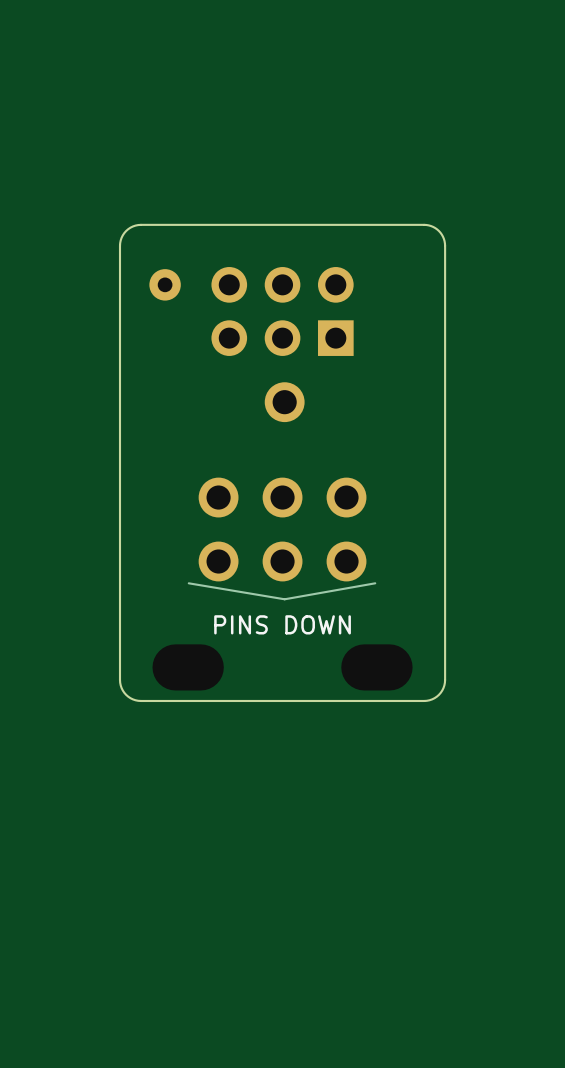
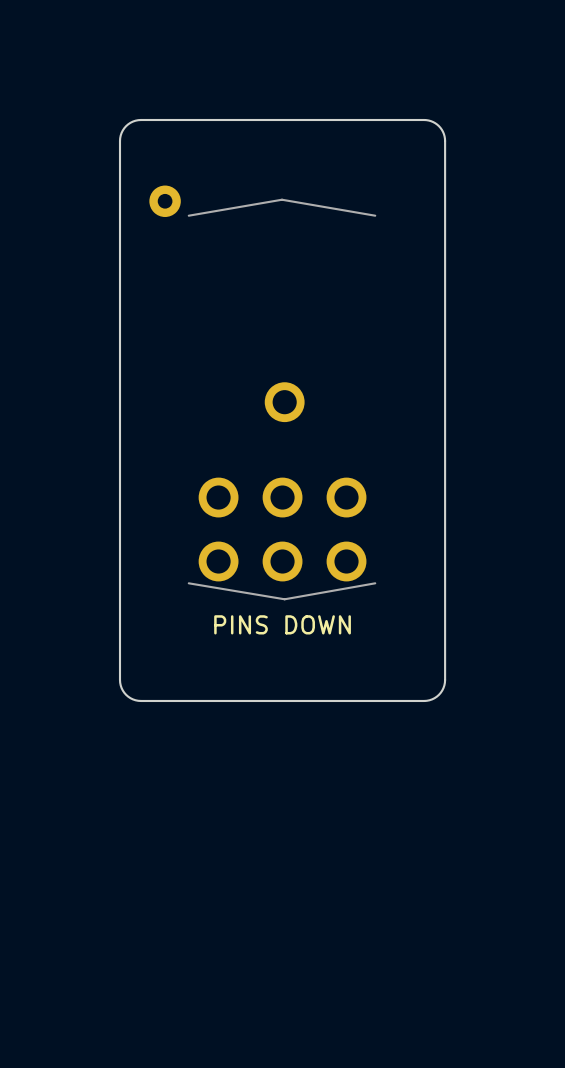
line: none -> (375, 215) (282, 199) (188, 215)
board edge: (445, 245) (443, 236) (438, 231) (433, 226) (424, 224) (138, 225) (126, 231) (121, 237) (119, 245) -> (445, 245) (444, 138) (438, 126) (433, 122) (424, 119) (140, 119) (132, 121) (124, 128) (120, 138) (119, 245)
part position: (165, 284) -> (165, 201)
part: (282, 311) -> none

